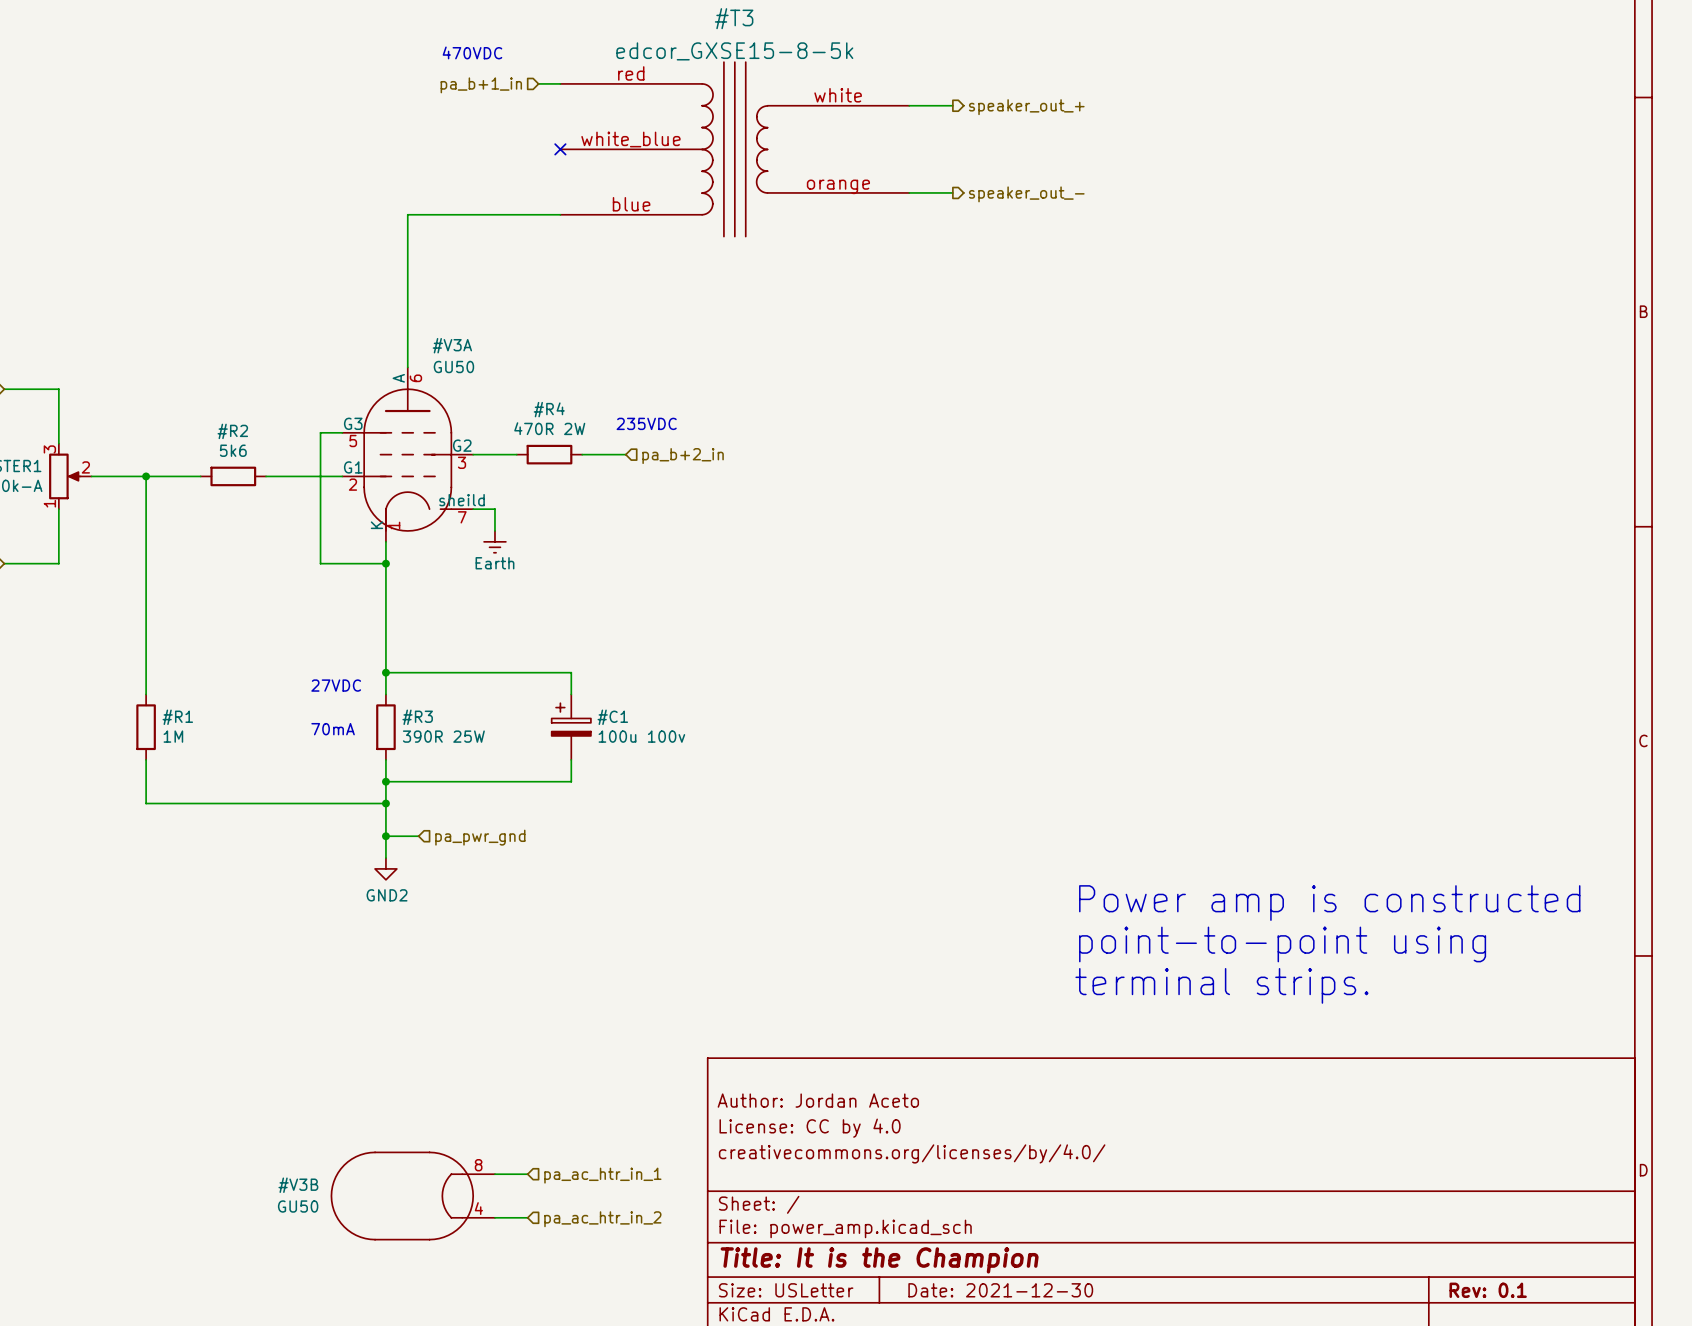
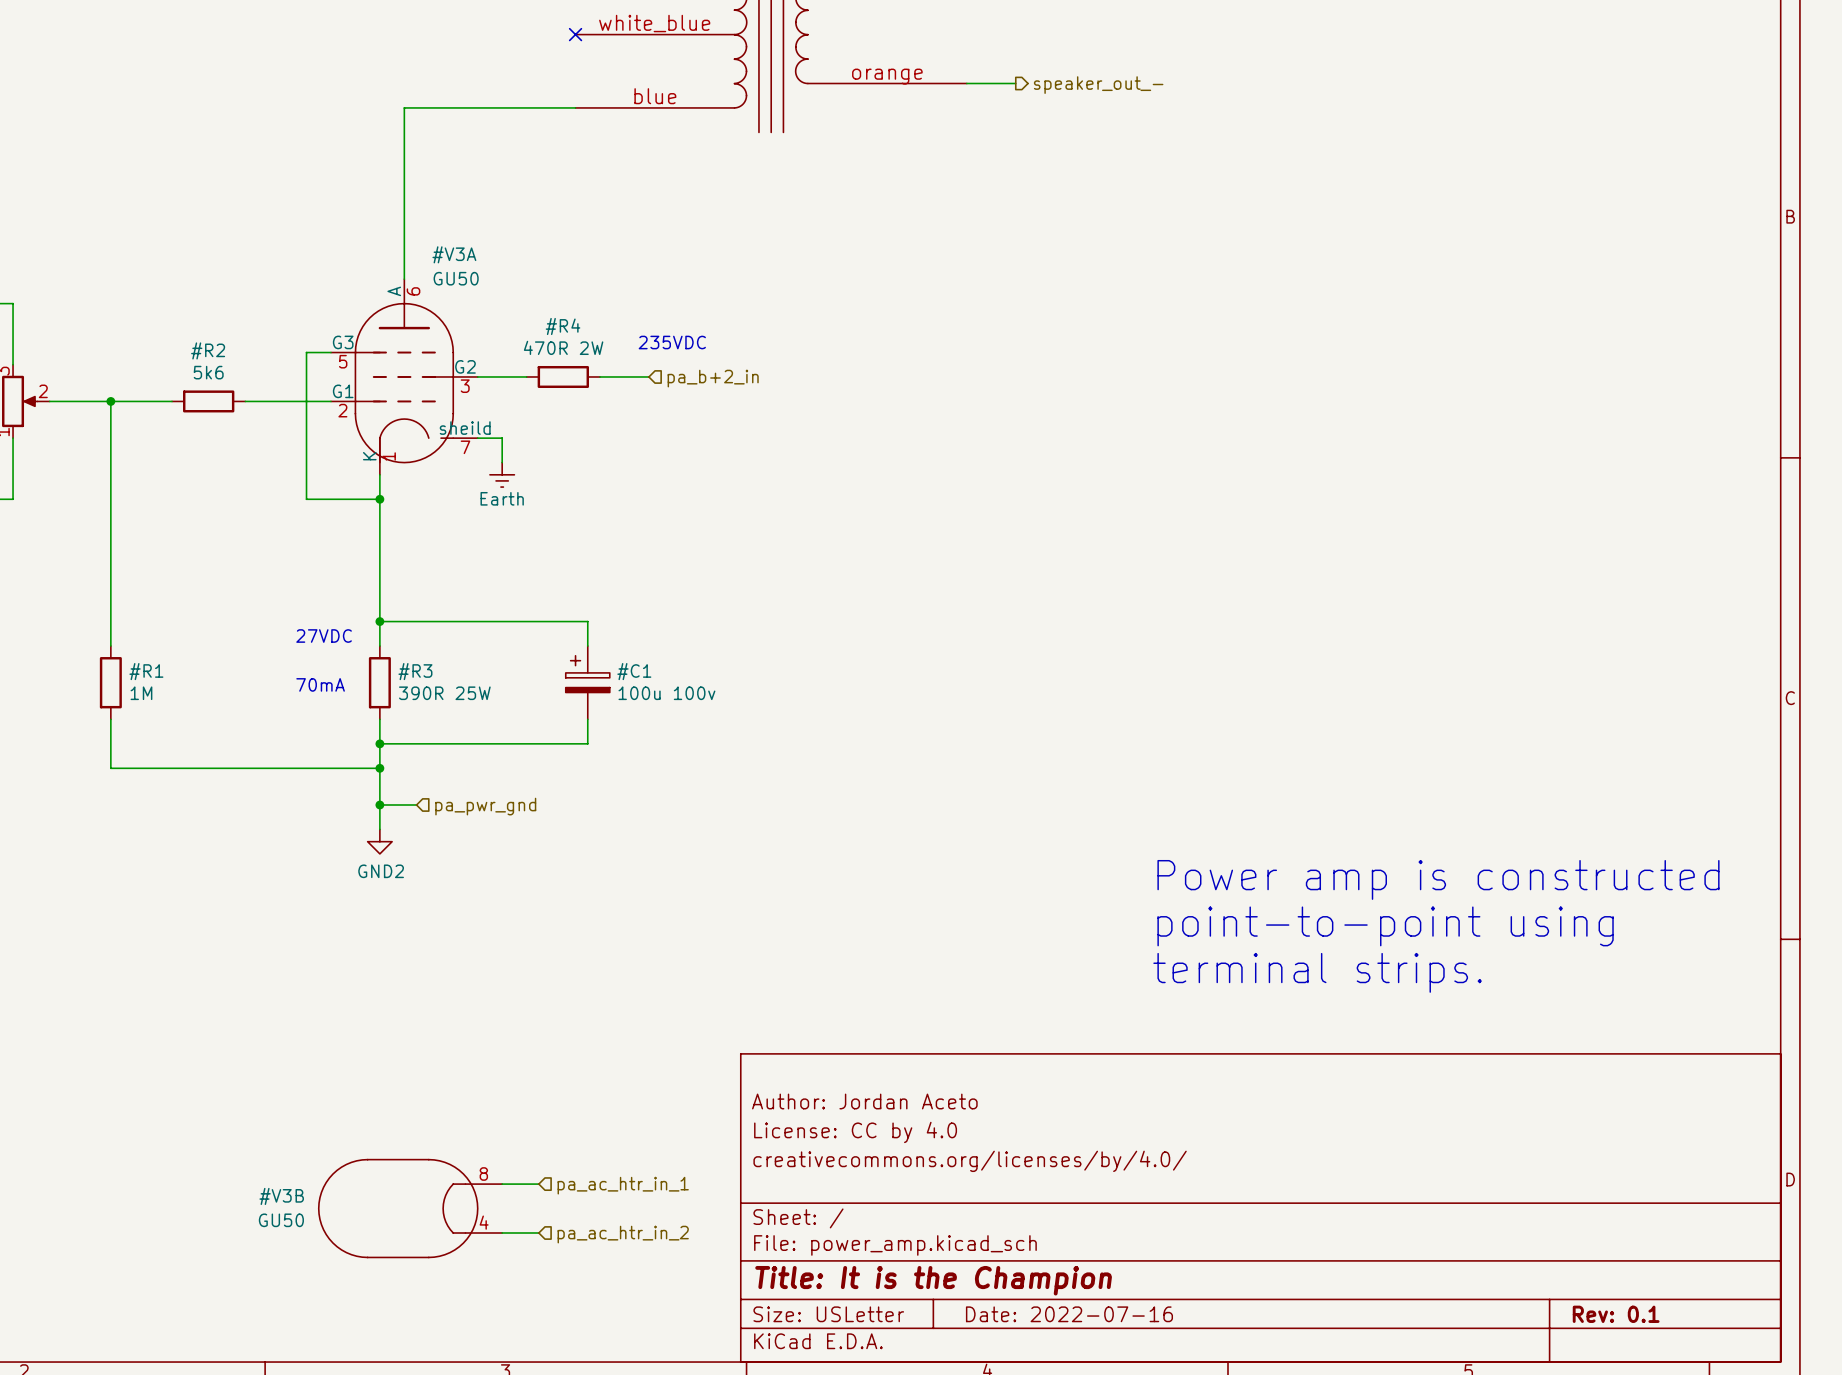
title block: Date: 2021-12-30 (1000, 1290) -> Date: 2022-07-16 (1069, 1314)

